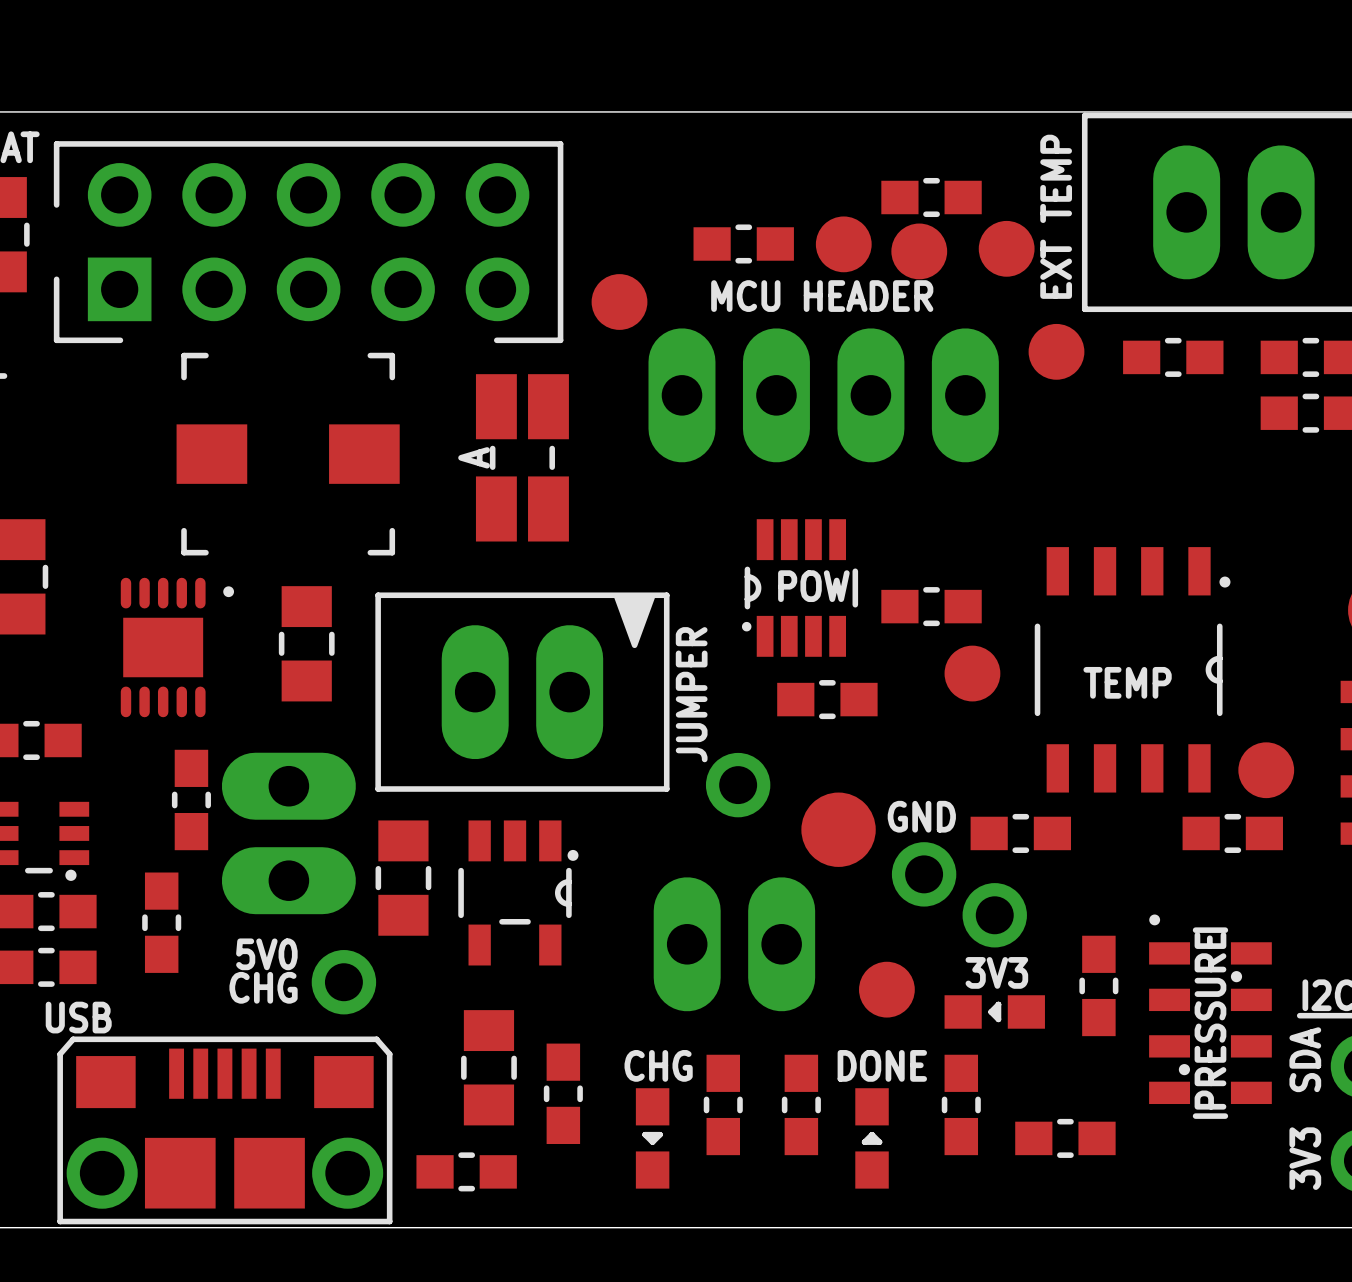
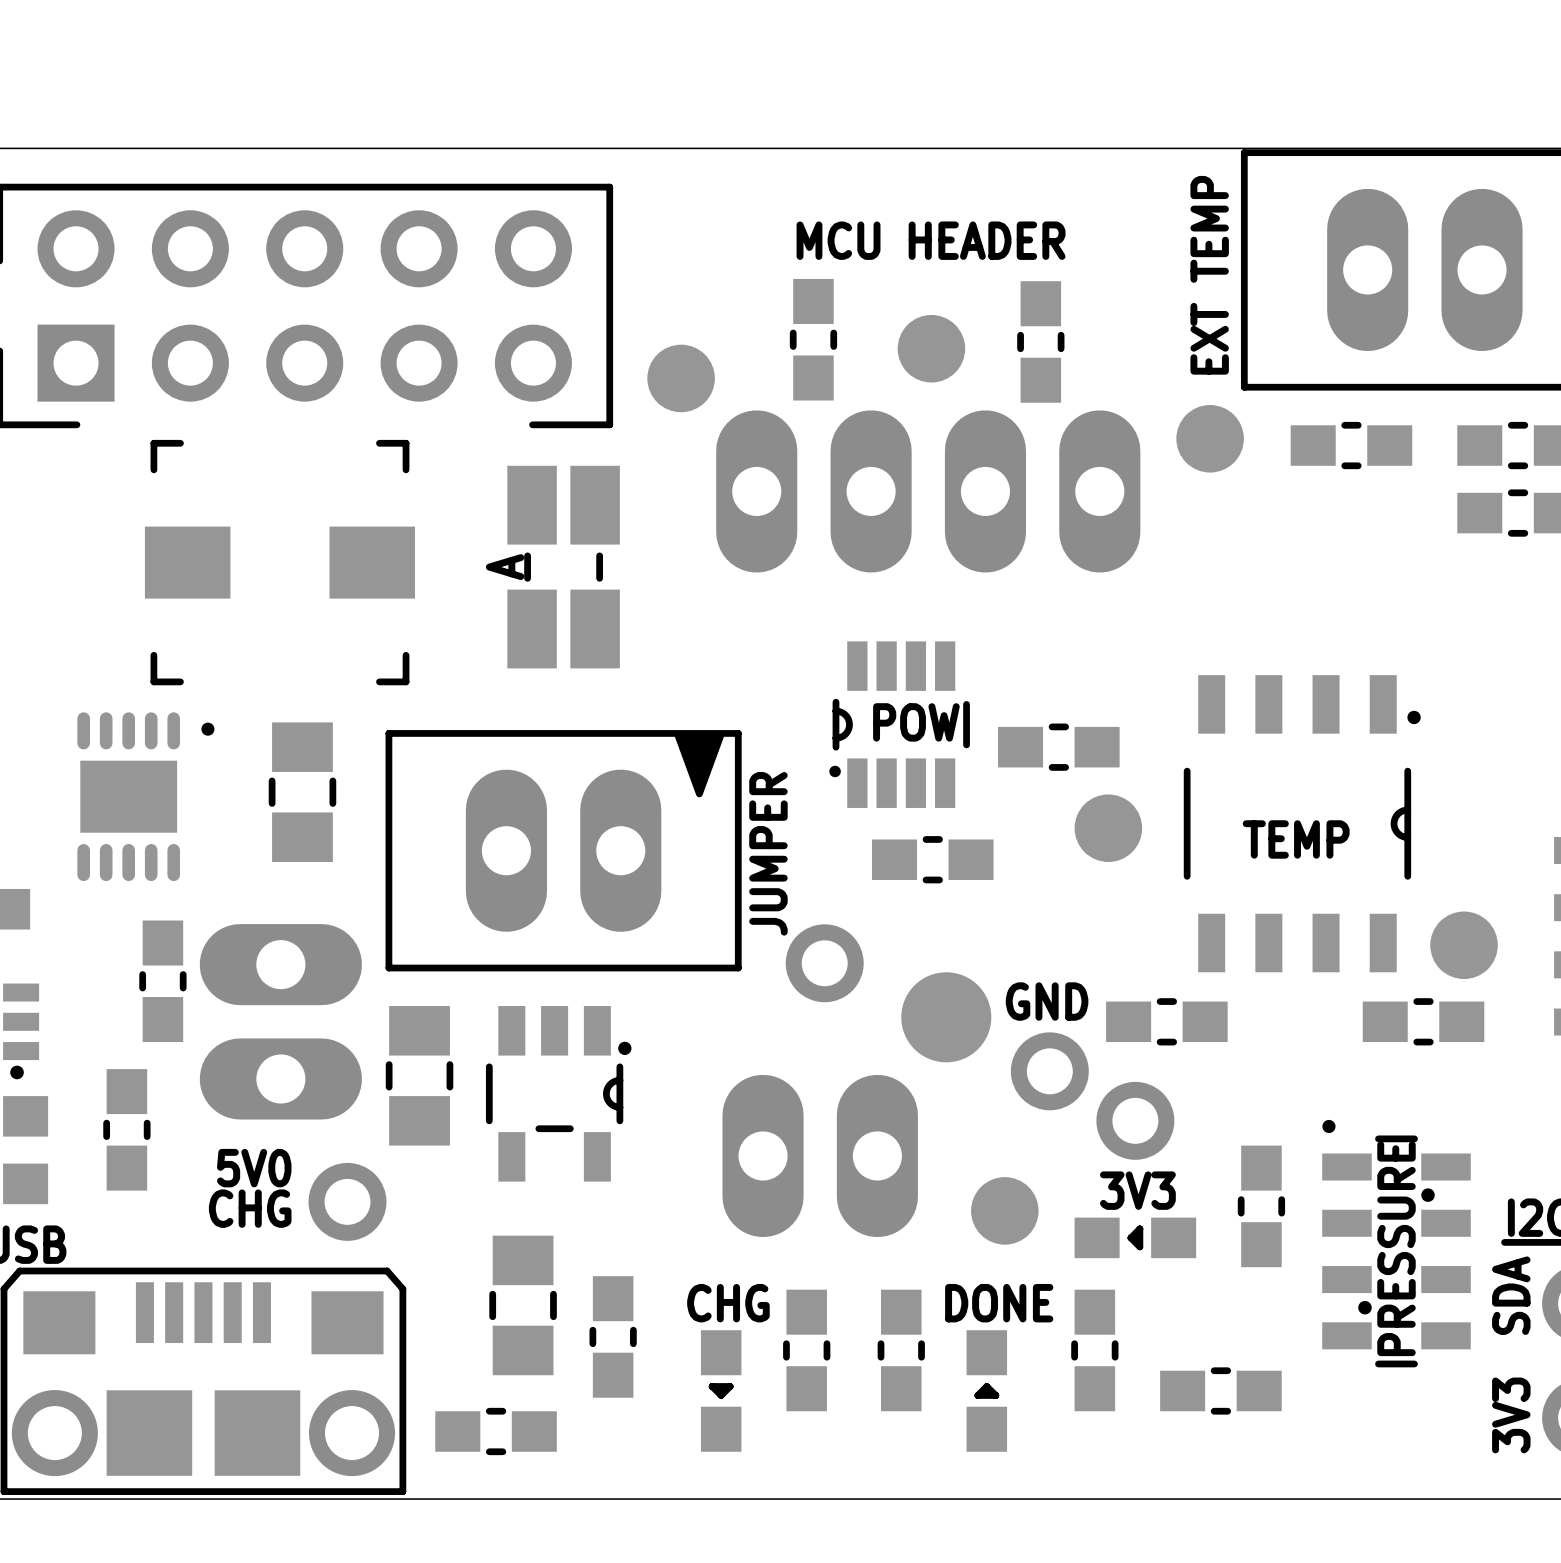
part: (931, 197) -> none
part footprint: [891, 223, 948, 280] -> [1017, 281, 1065, 403]
part rotation: 0° (743, 243) -> 90° clockwise (813, 339)
part position: (843, 244) -> (931, 348)
part: (1006, 248) -> none
text position: MCU HEADER (822, 296) -> MCU HEADER (931, 240)

